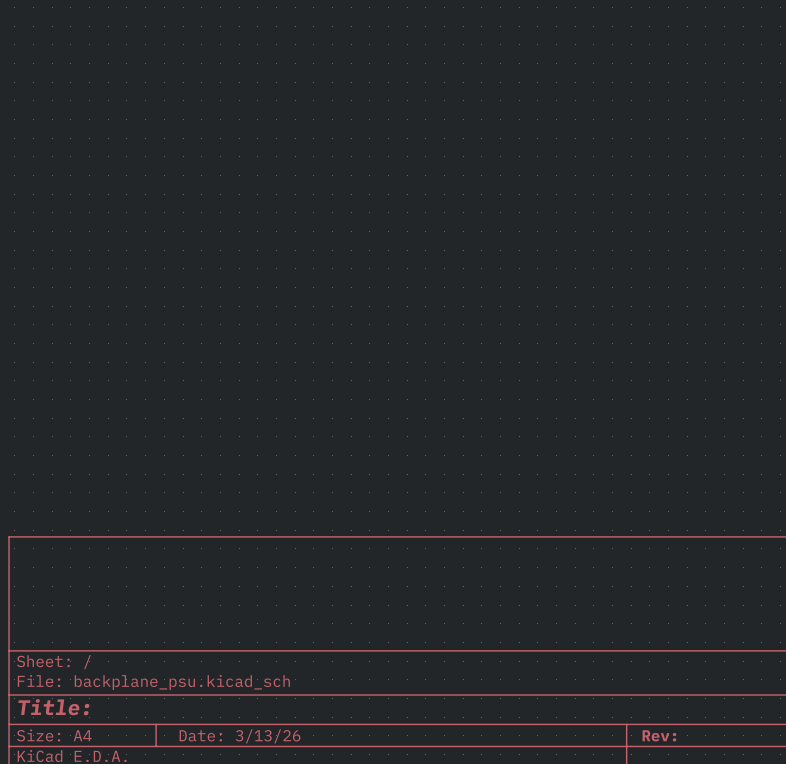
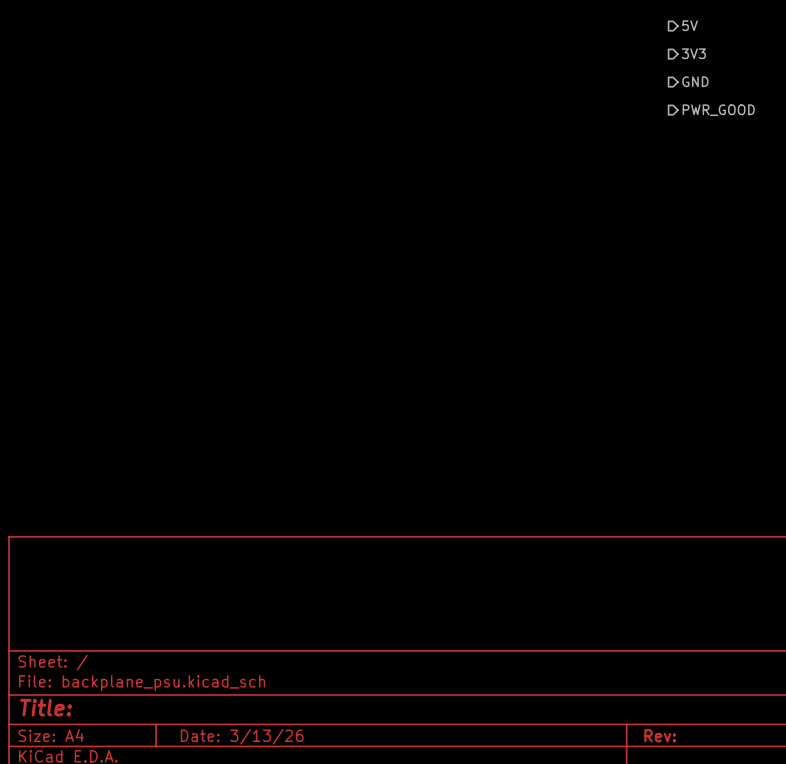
hierarchical label: none -> 5V (690, 25)
hierarchical label: none -> 3V3 (693, 53)
hierarchical label: none -> GND (695, 81)
hierarchical label: none -> PWR_GOOD (718, 110)

